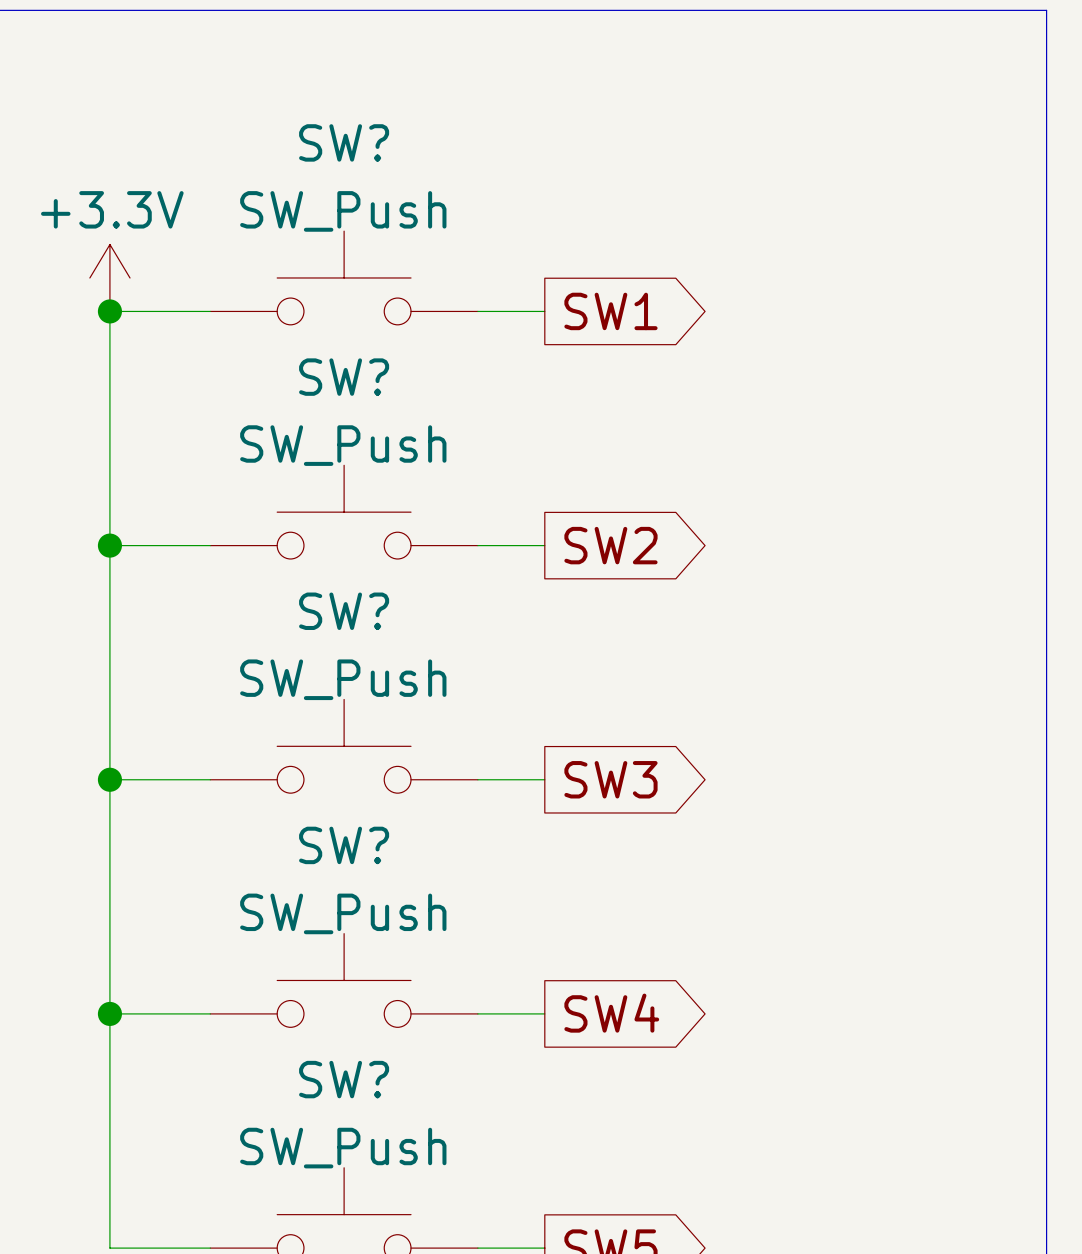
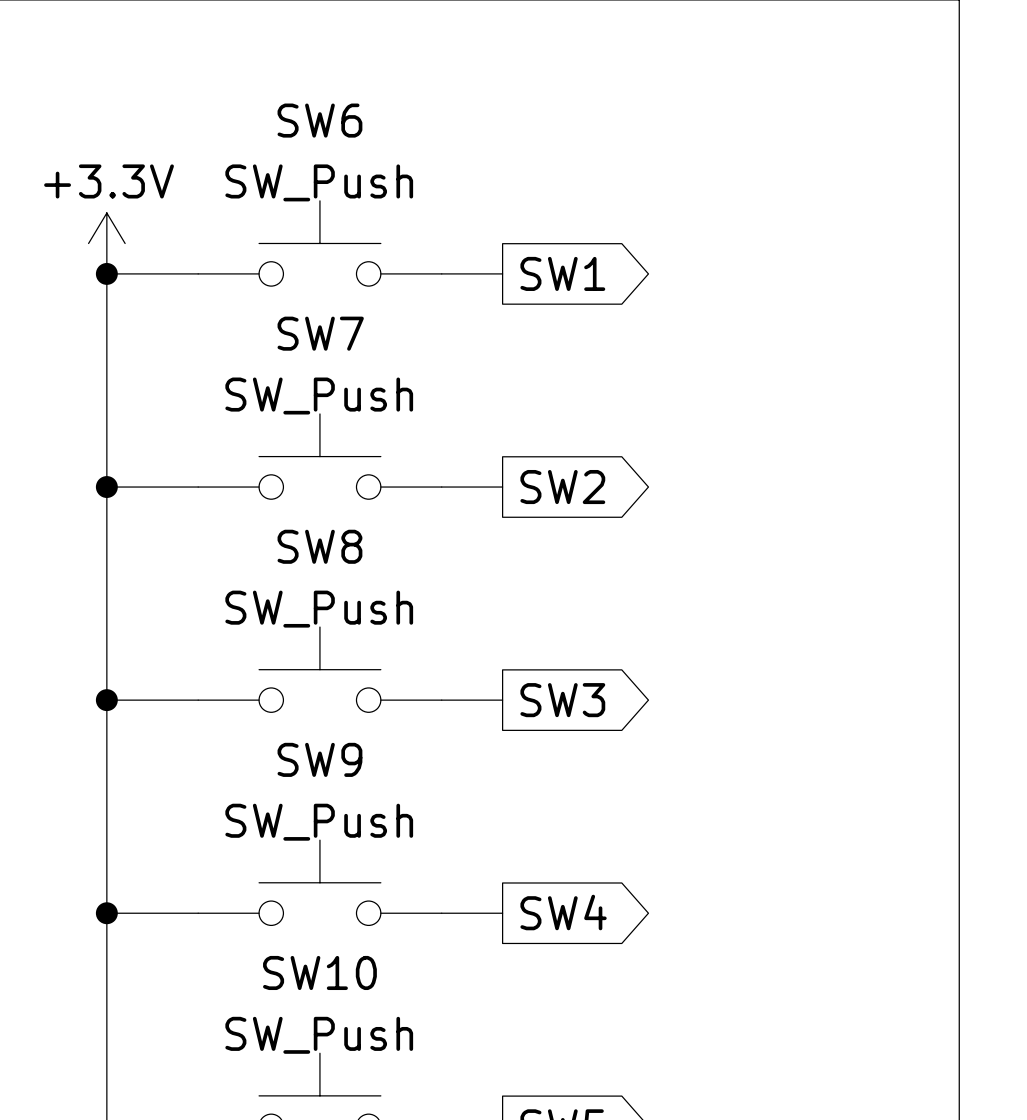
SW? name: SW? (344, 142) -> SW6 (319, 120)
SW? name: SW? (344, 377) -> SW7 (320, 333)
SW? name: SW? (344, 611) -> SW8 (319, 546)
SW? name: SW? (344, 845) -> SW9 (319, 759)
SW? name: SW? (344, 1079) -> SW10 (319, 972)

